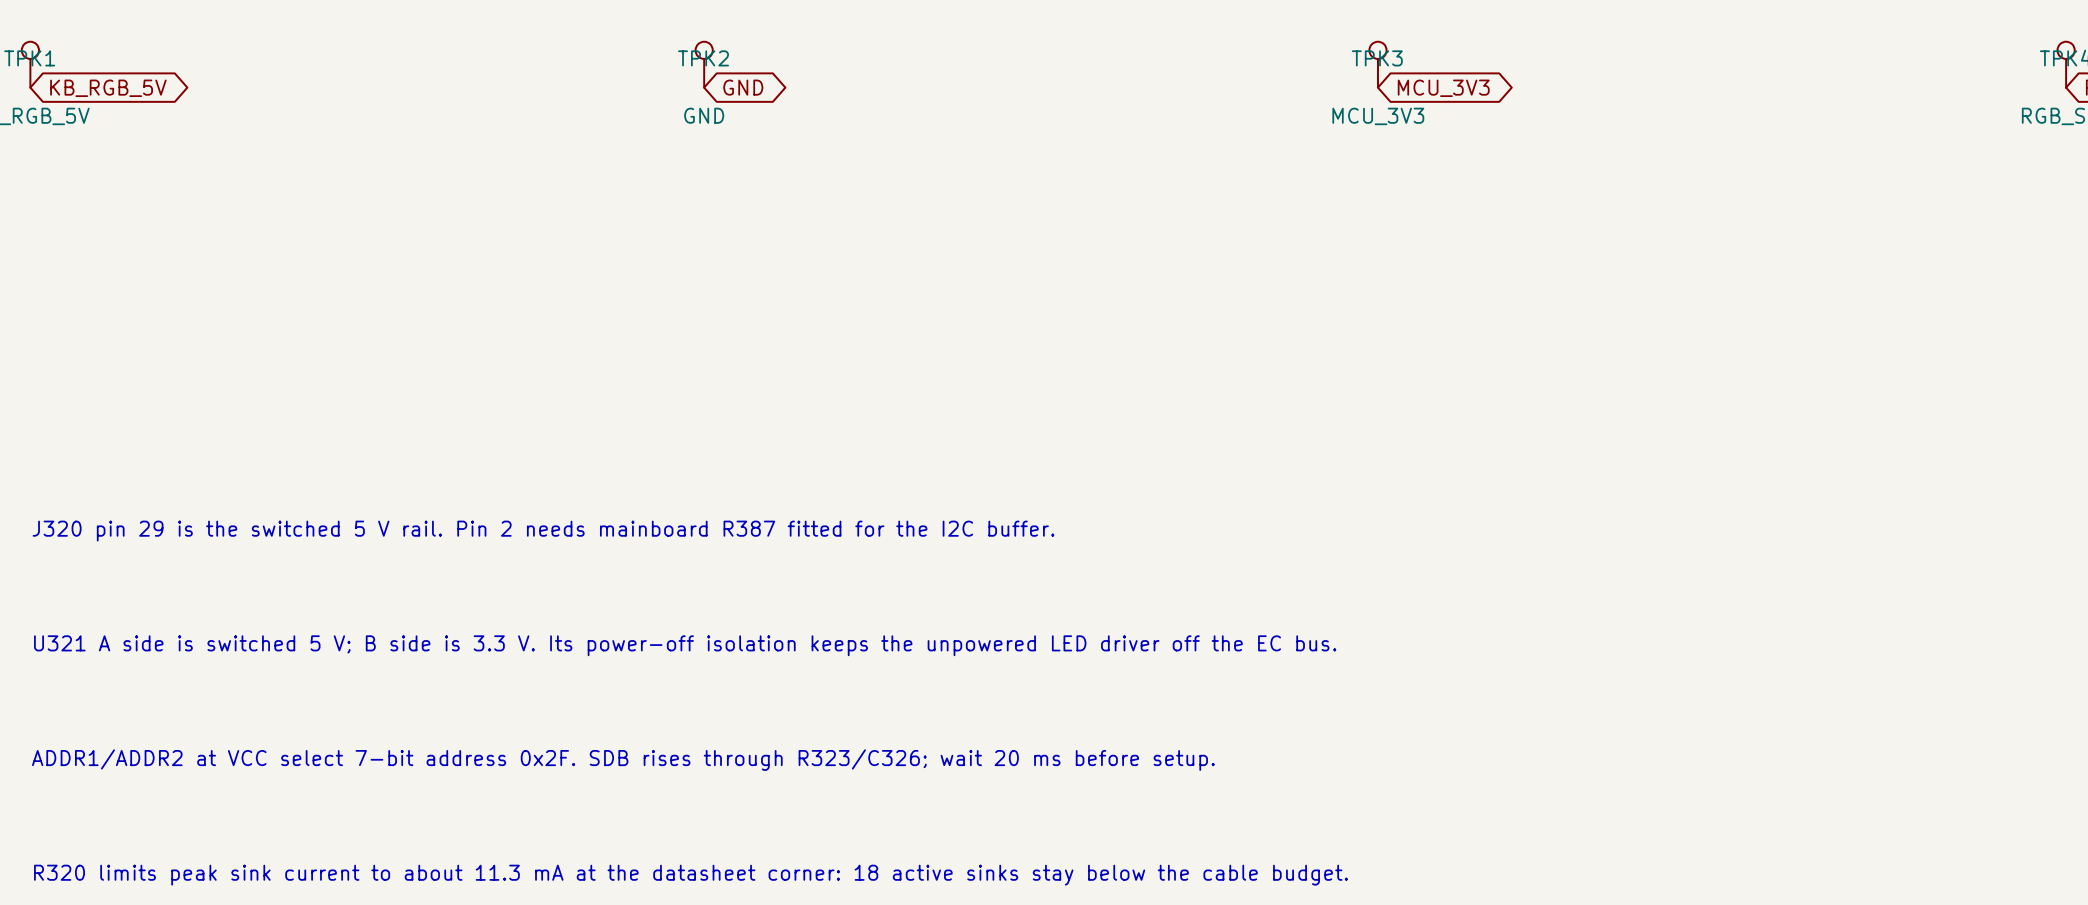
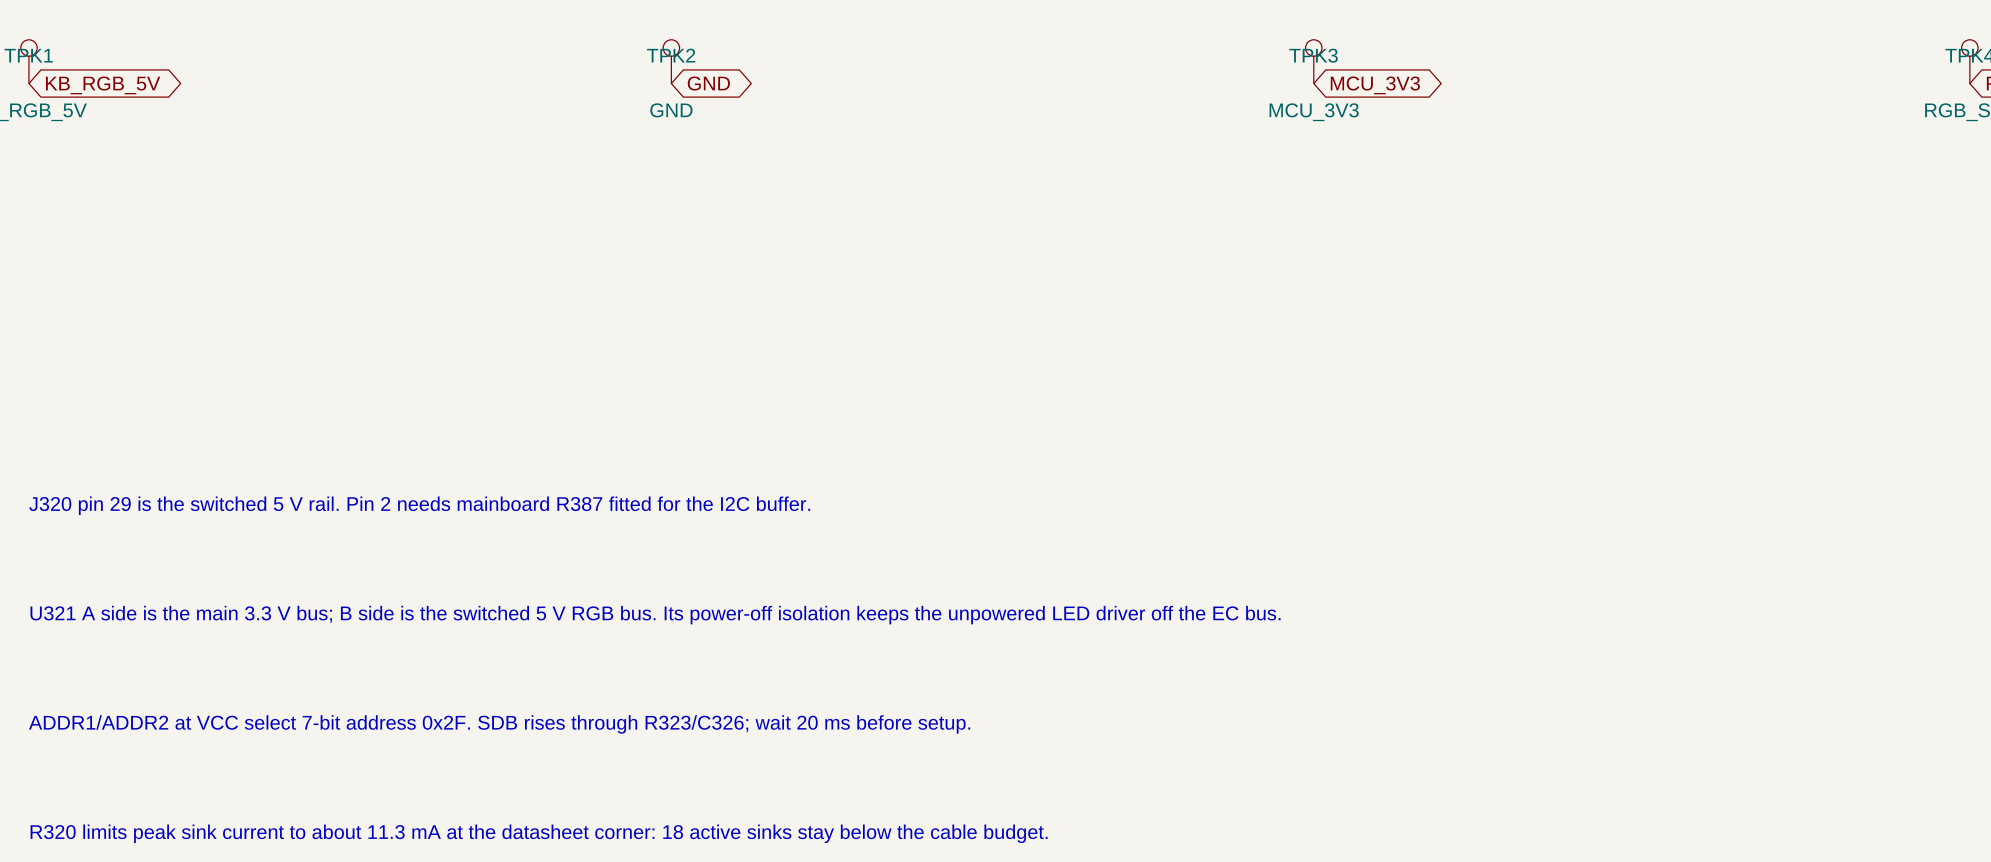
text: U321 A side is switched 5 V; B side is 3.3 V. Its power-off isolation keeps the unpowered LED driver off the EC bus. (685, 645) -> U321 A side is the main 3.3 V bus; B side is the switched 5 V RGB bus. Its power-off isolation keeps the unpowered LED driver off the EC bus. (655, 615)

